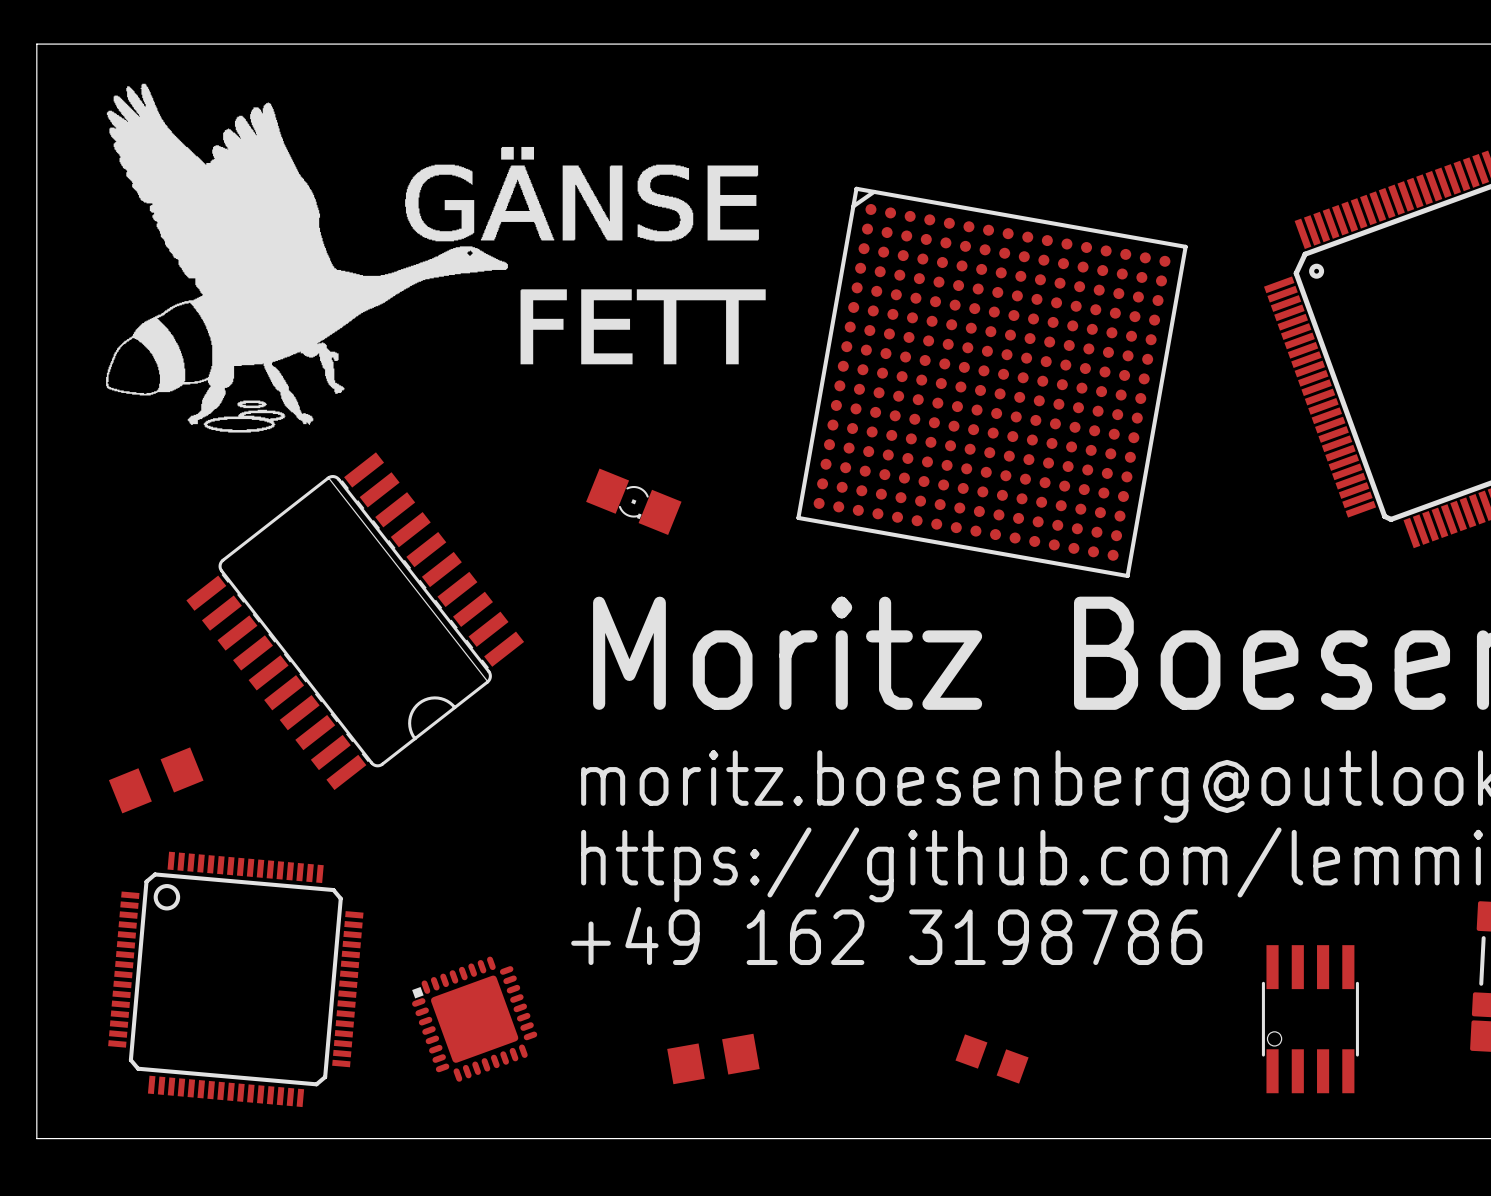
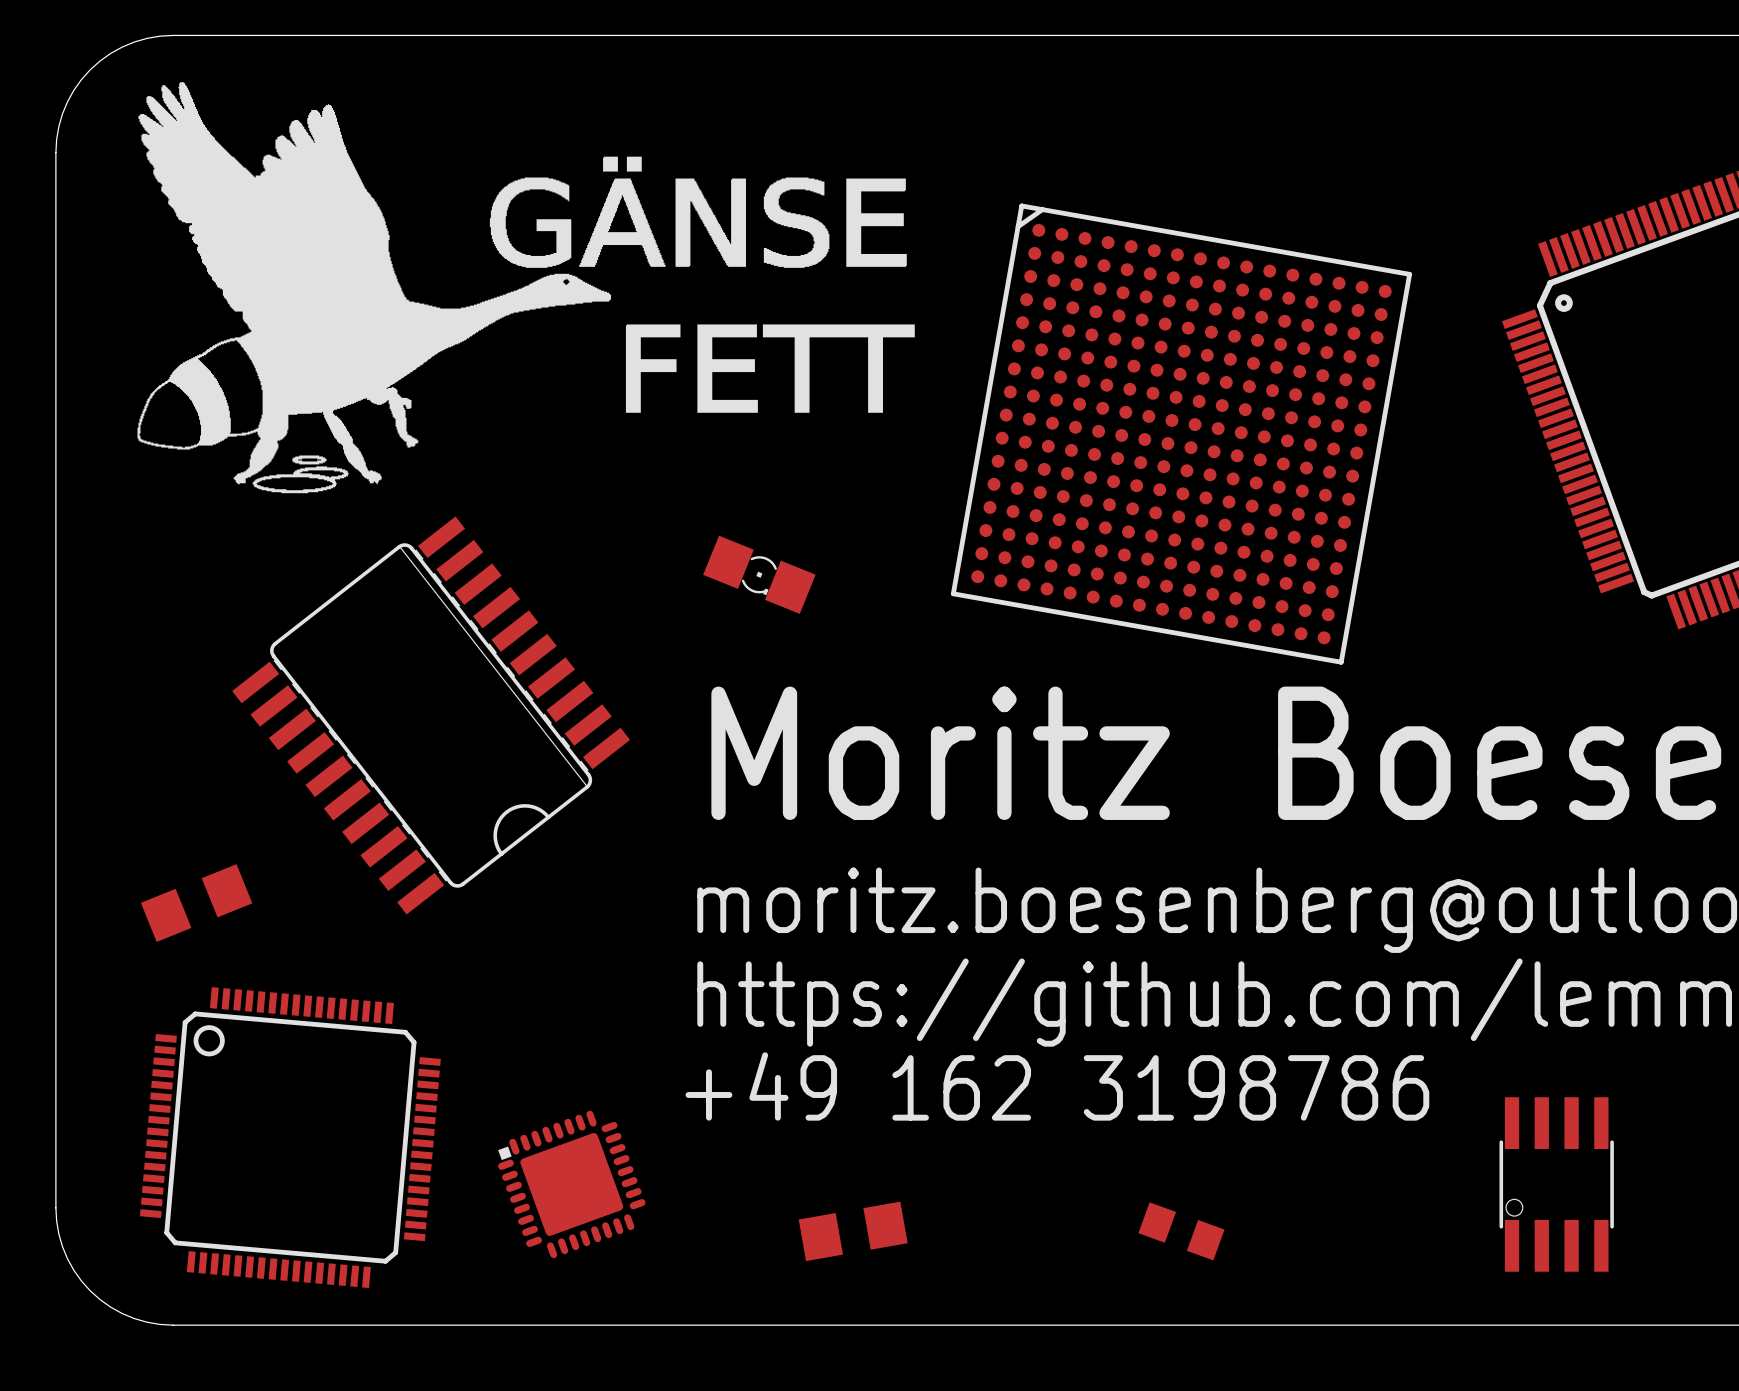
board edge: (136, 44) (36, 44) (36, 143) -> (173, 35) (134, 42) (110, 53) (90, 69) (73, 90) (62, 113) (55, 152)
board edge: (36, 1039) (36, 1138) (136, 1138) -> (55, 1207) (62, 1246) (73, 1270) (90, 1290) (110, 1307) (134, 1318) (173, 1325)

